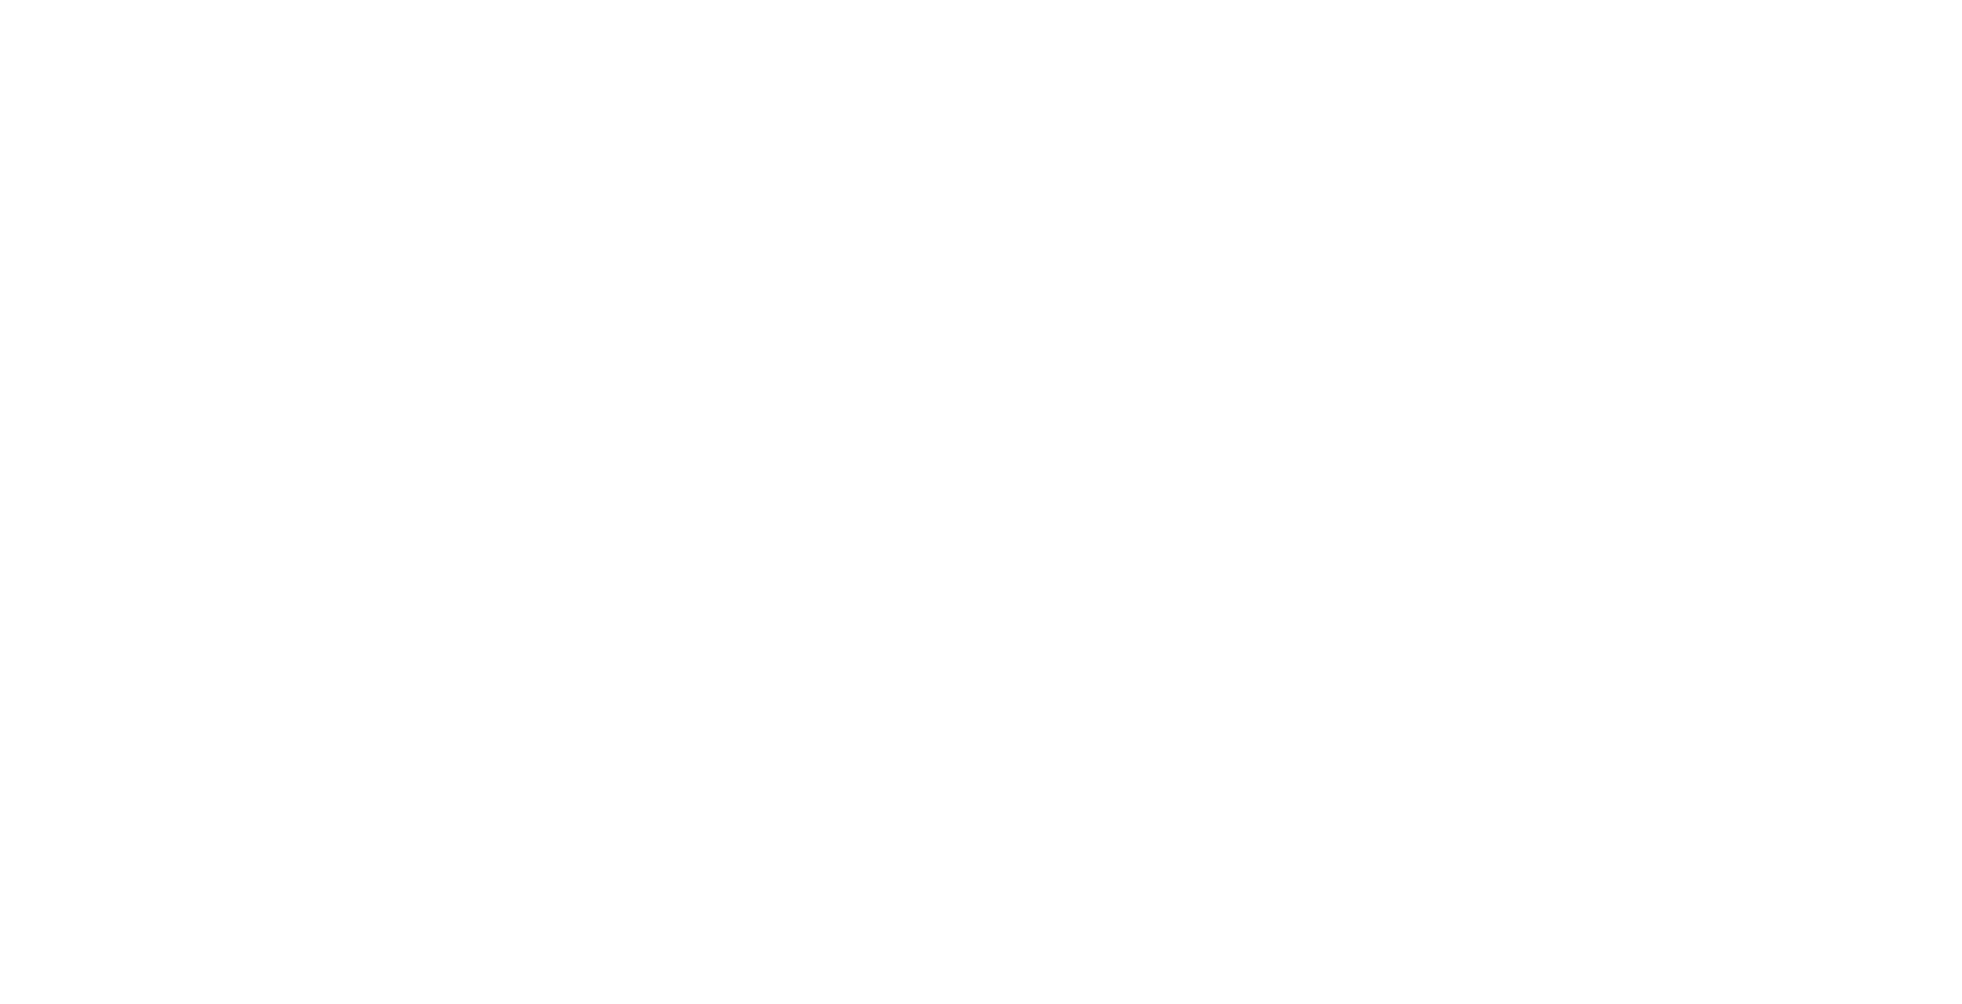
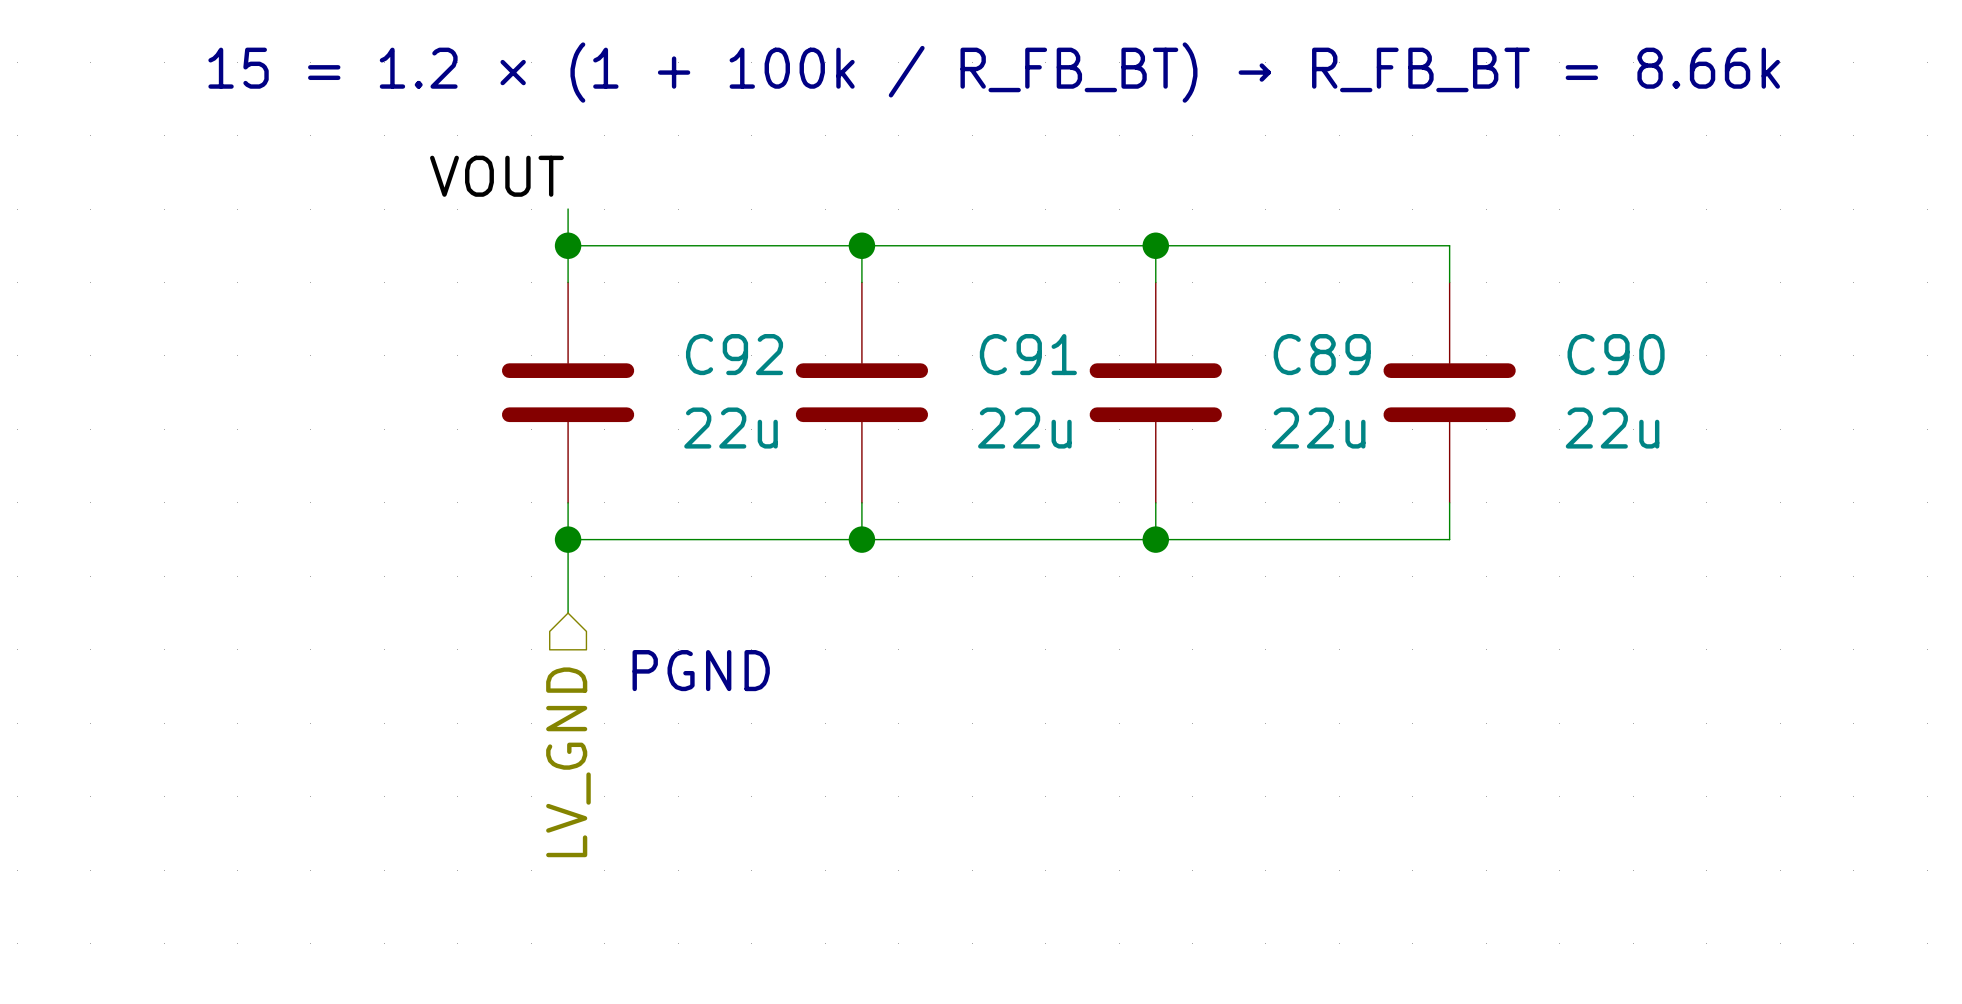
text: none -> 15 = 1.2 × (1 + 100k / R_FB_BT) → R_FB_BT = 8.66k (994, 72)
label: none -> VOUT (496, 176)
wire: none -> (568, 209) (568, 282)
wire: none -> (568, 245) (1449, 245) (1449, 282)
junction: none -> (568, 245)
wire: none -> (861, 245) (861, 282)
junction: none -> (861, 245)
wire: none -> (1155, 245) (1155, 282)
junction: none -> (1155, 245)
C92: none -> 22u (568, 392)
C91: none -> 22u (861, 392)
C89: none -> 22u (1155, 392)
C90: none -> 22u (1449, 392)
wire: none -> (568, 502) (568, 613)
wire: none -> (861, 502) (861, 539)
wire: none -> (1155, 502) (1155, 539)
wire: none -> (1449, 502) (1449, 539) (568, 539)
junction: none -> (568, 539)
junction: none -> (861, 539)
junction: none -> (1155, 539)
text: none -> PGND (701, 670)
hierarchical label: none -> LV_GND (568, 762)

